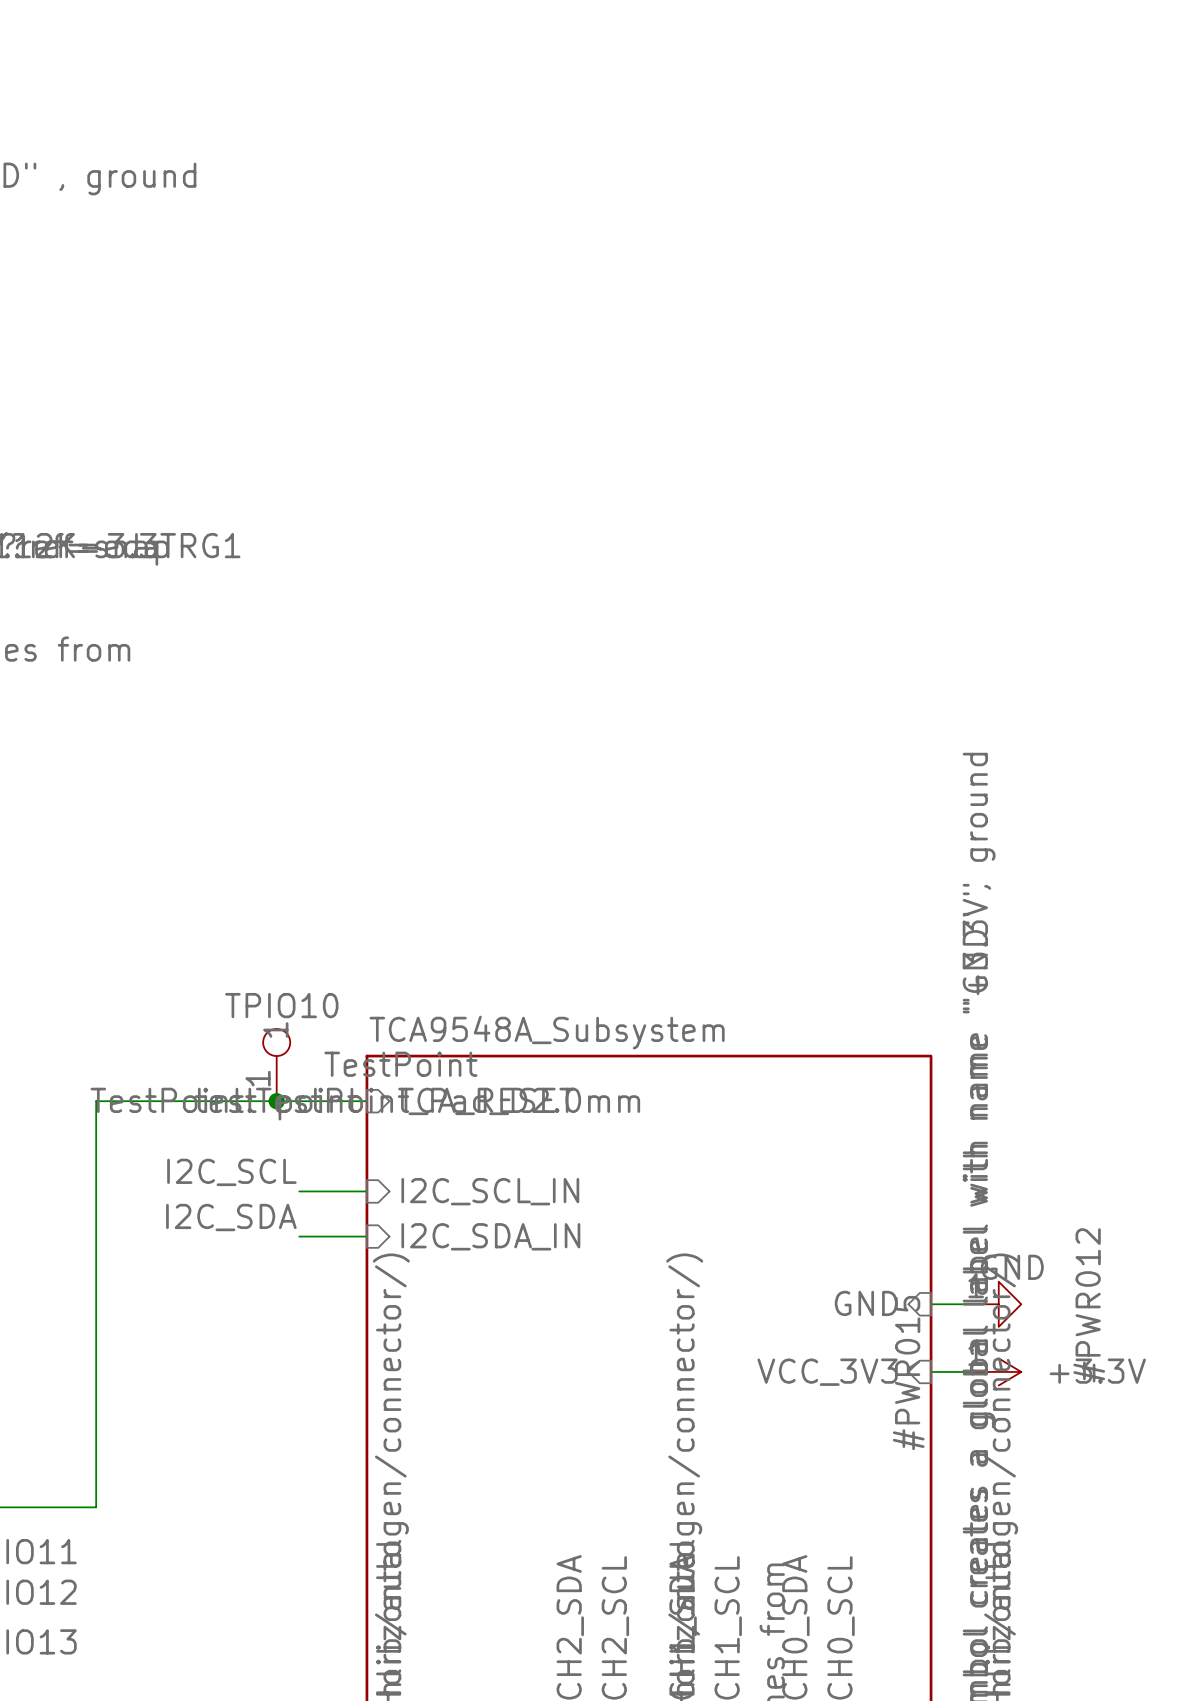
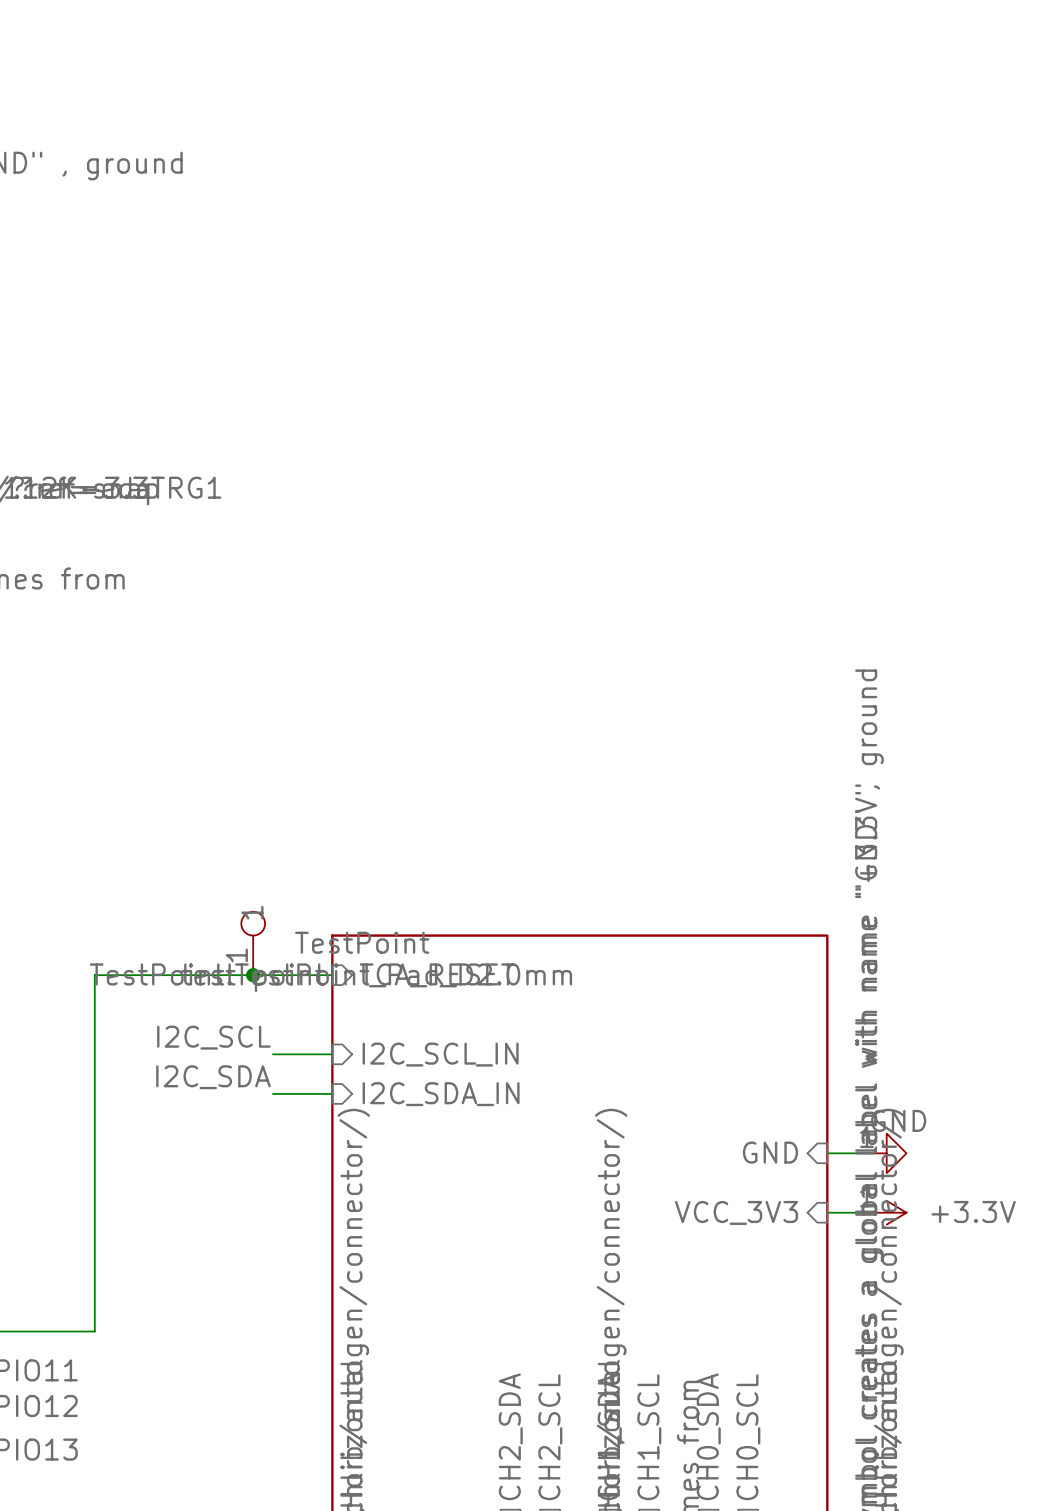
TPIO10 name: TPIO10 (281, 1005) -> none
sheet TCA9548A_Subsystem name: TCA9548A_Subsystem (547, 1032) -> none
#PWR012 name: #PWR012 (1089, 1305) -> none
#PWR015 name: #PWR015 (908, 1373) -> none

